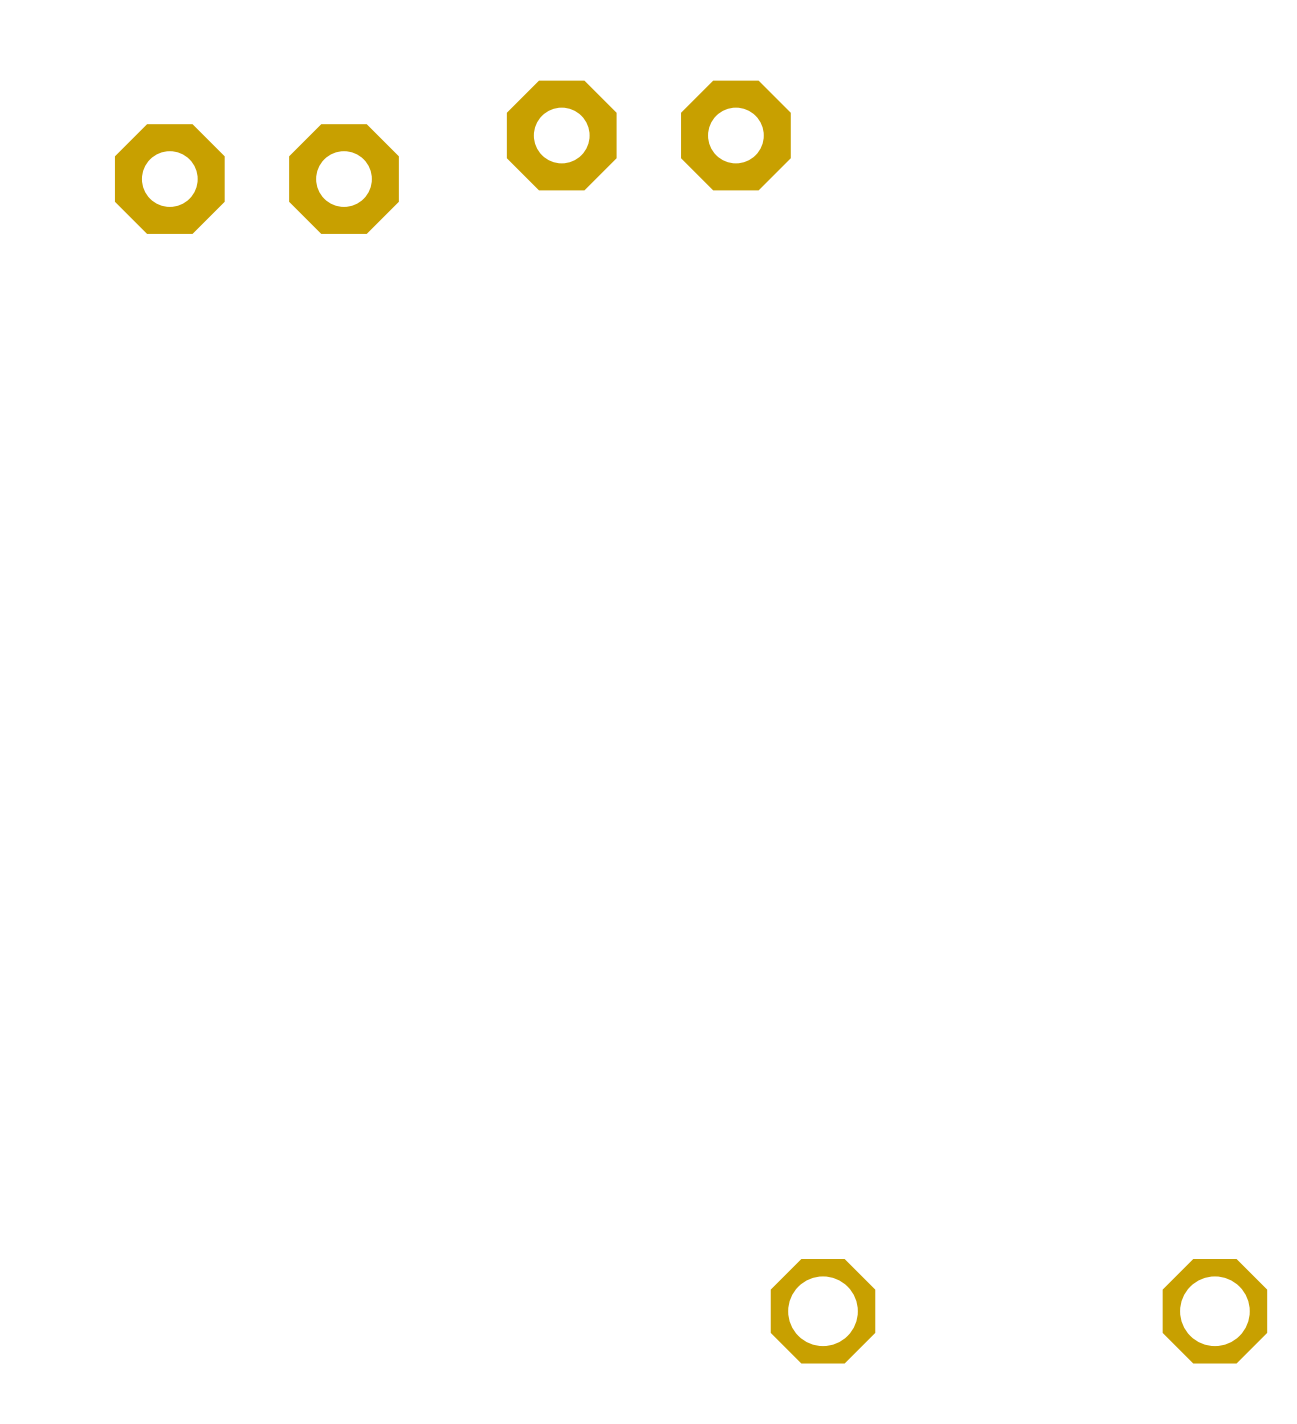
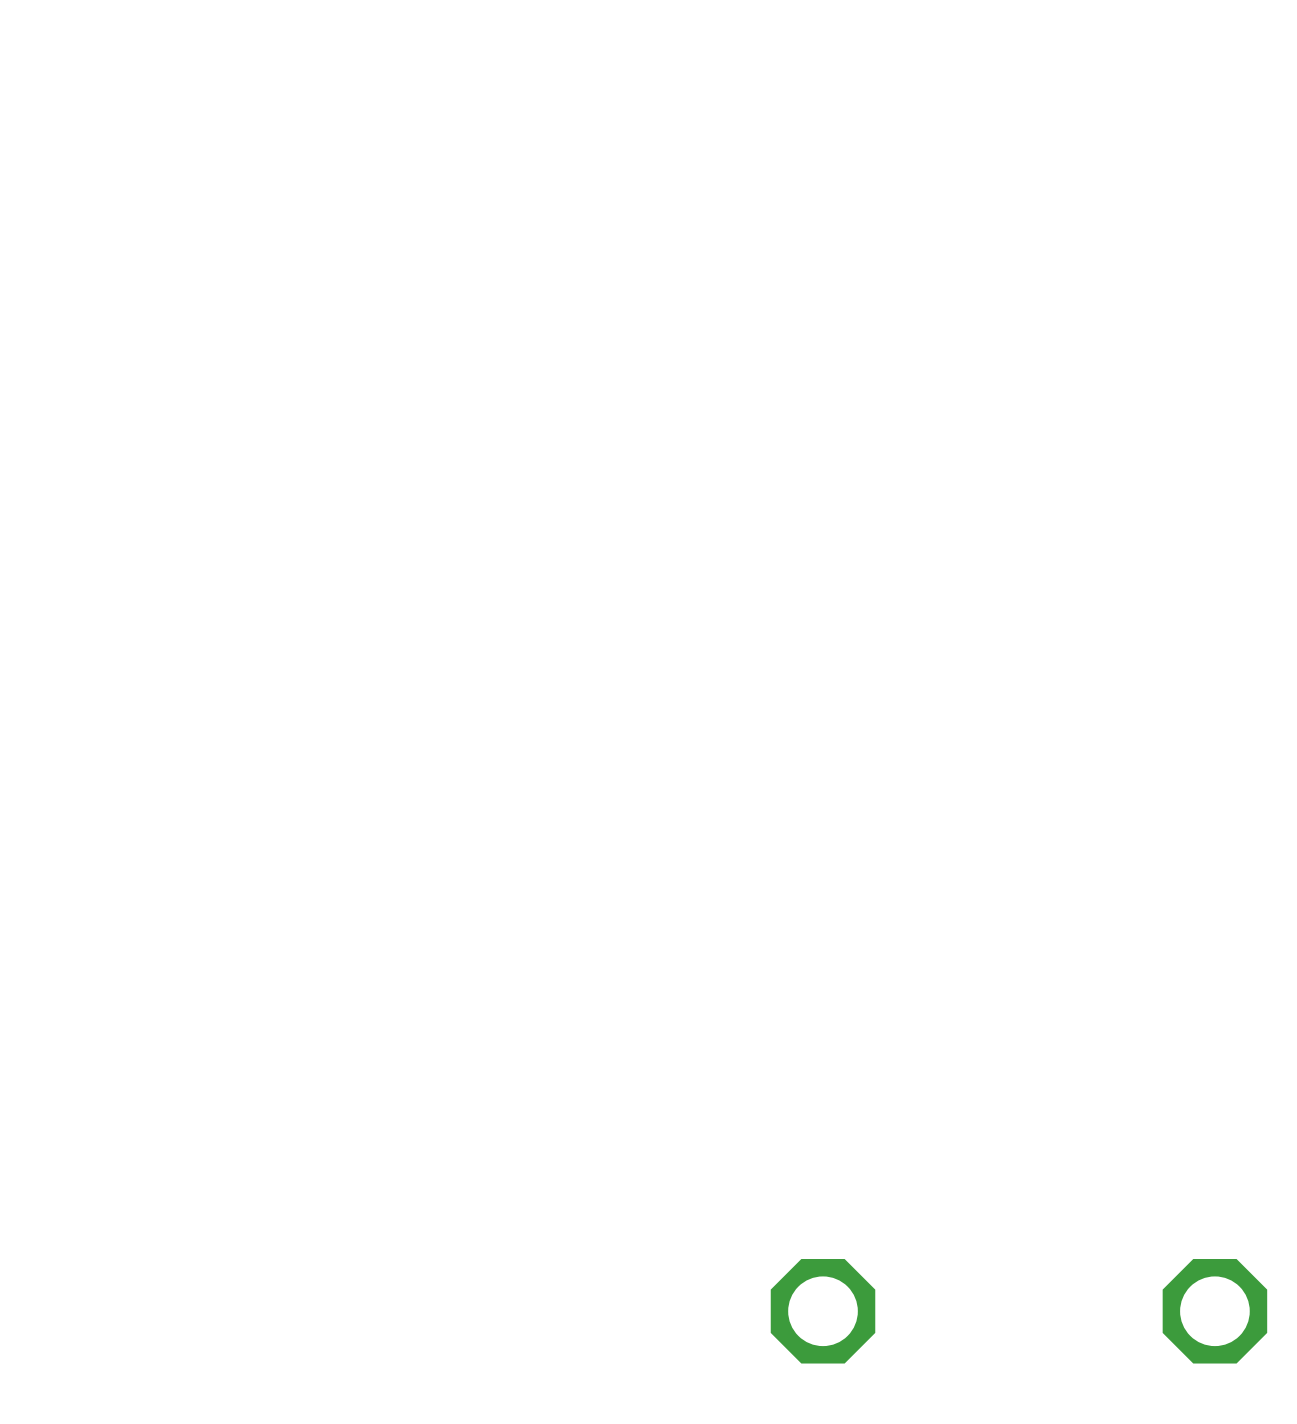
part: (648, 135) -> none
part: (256, 179) -> none

